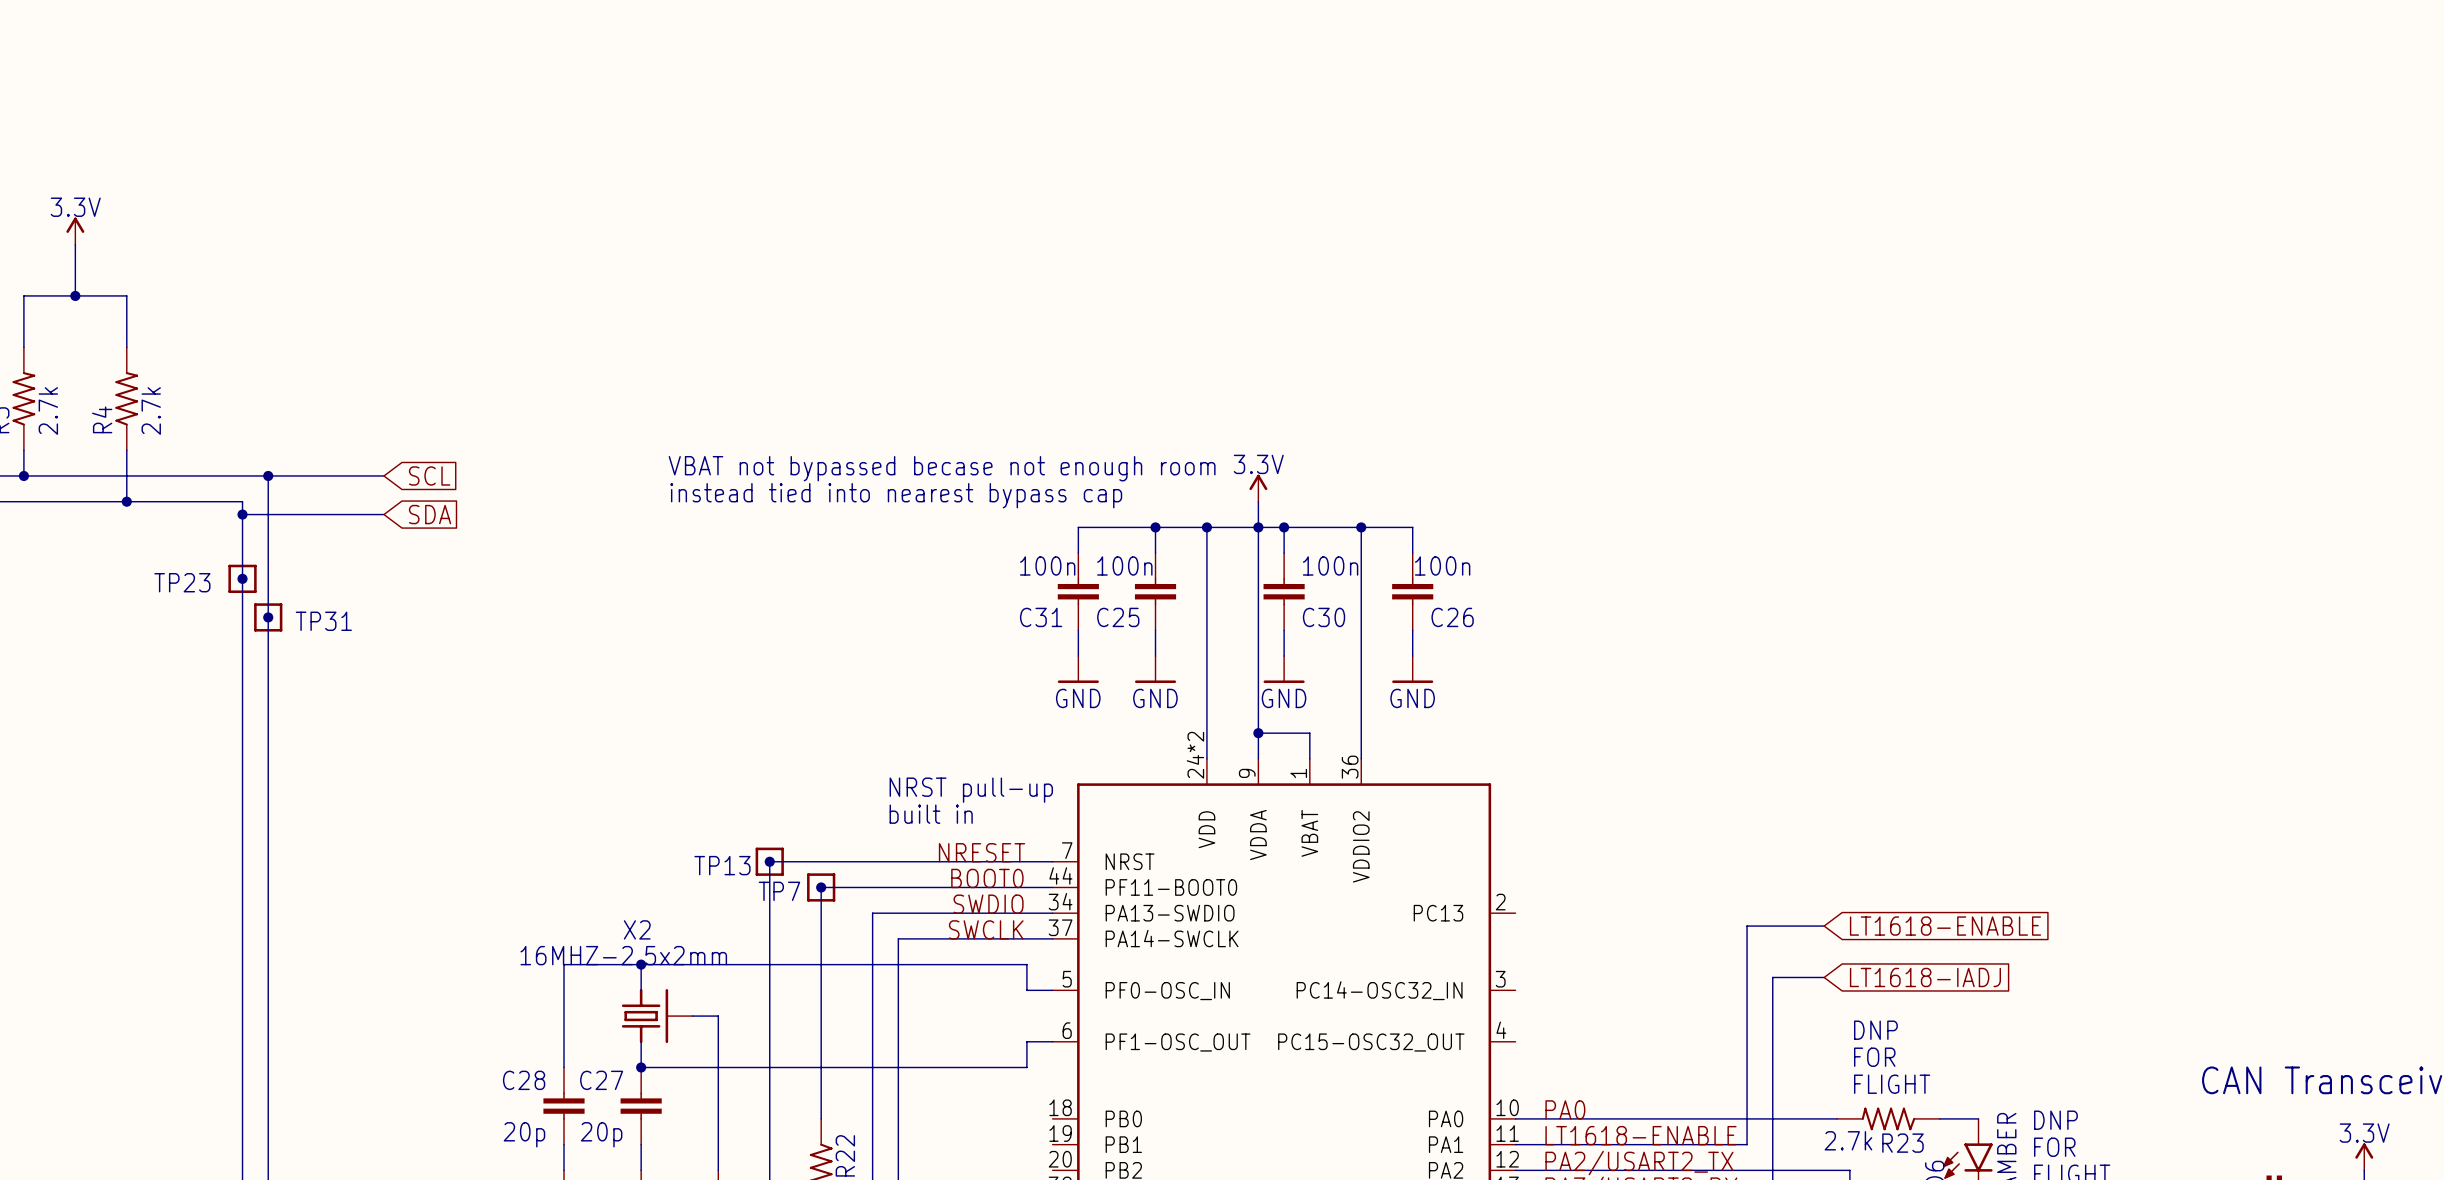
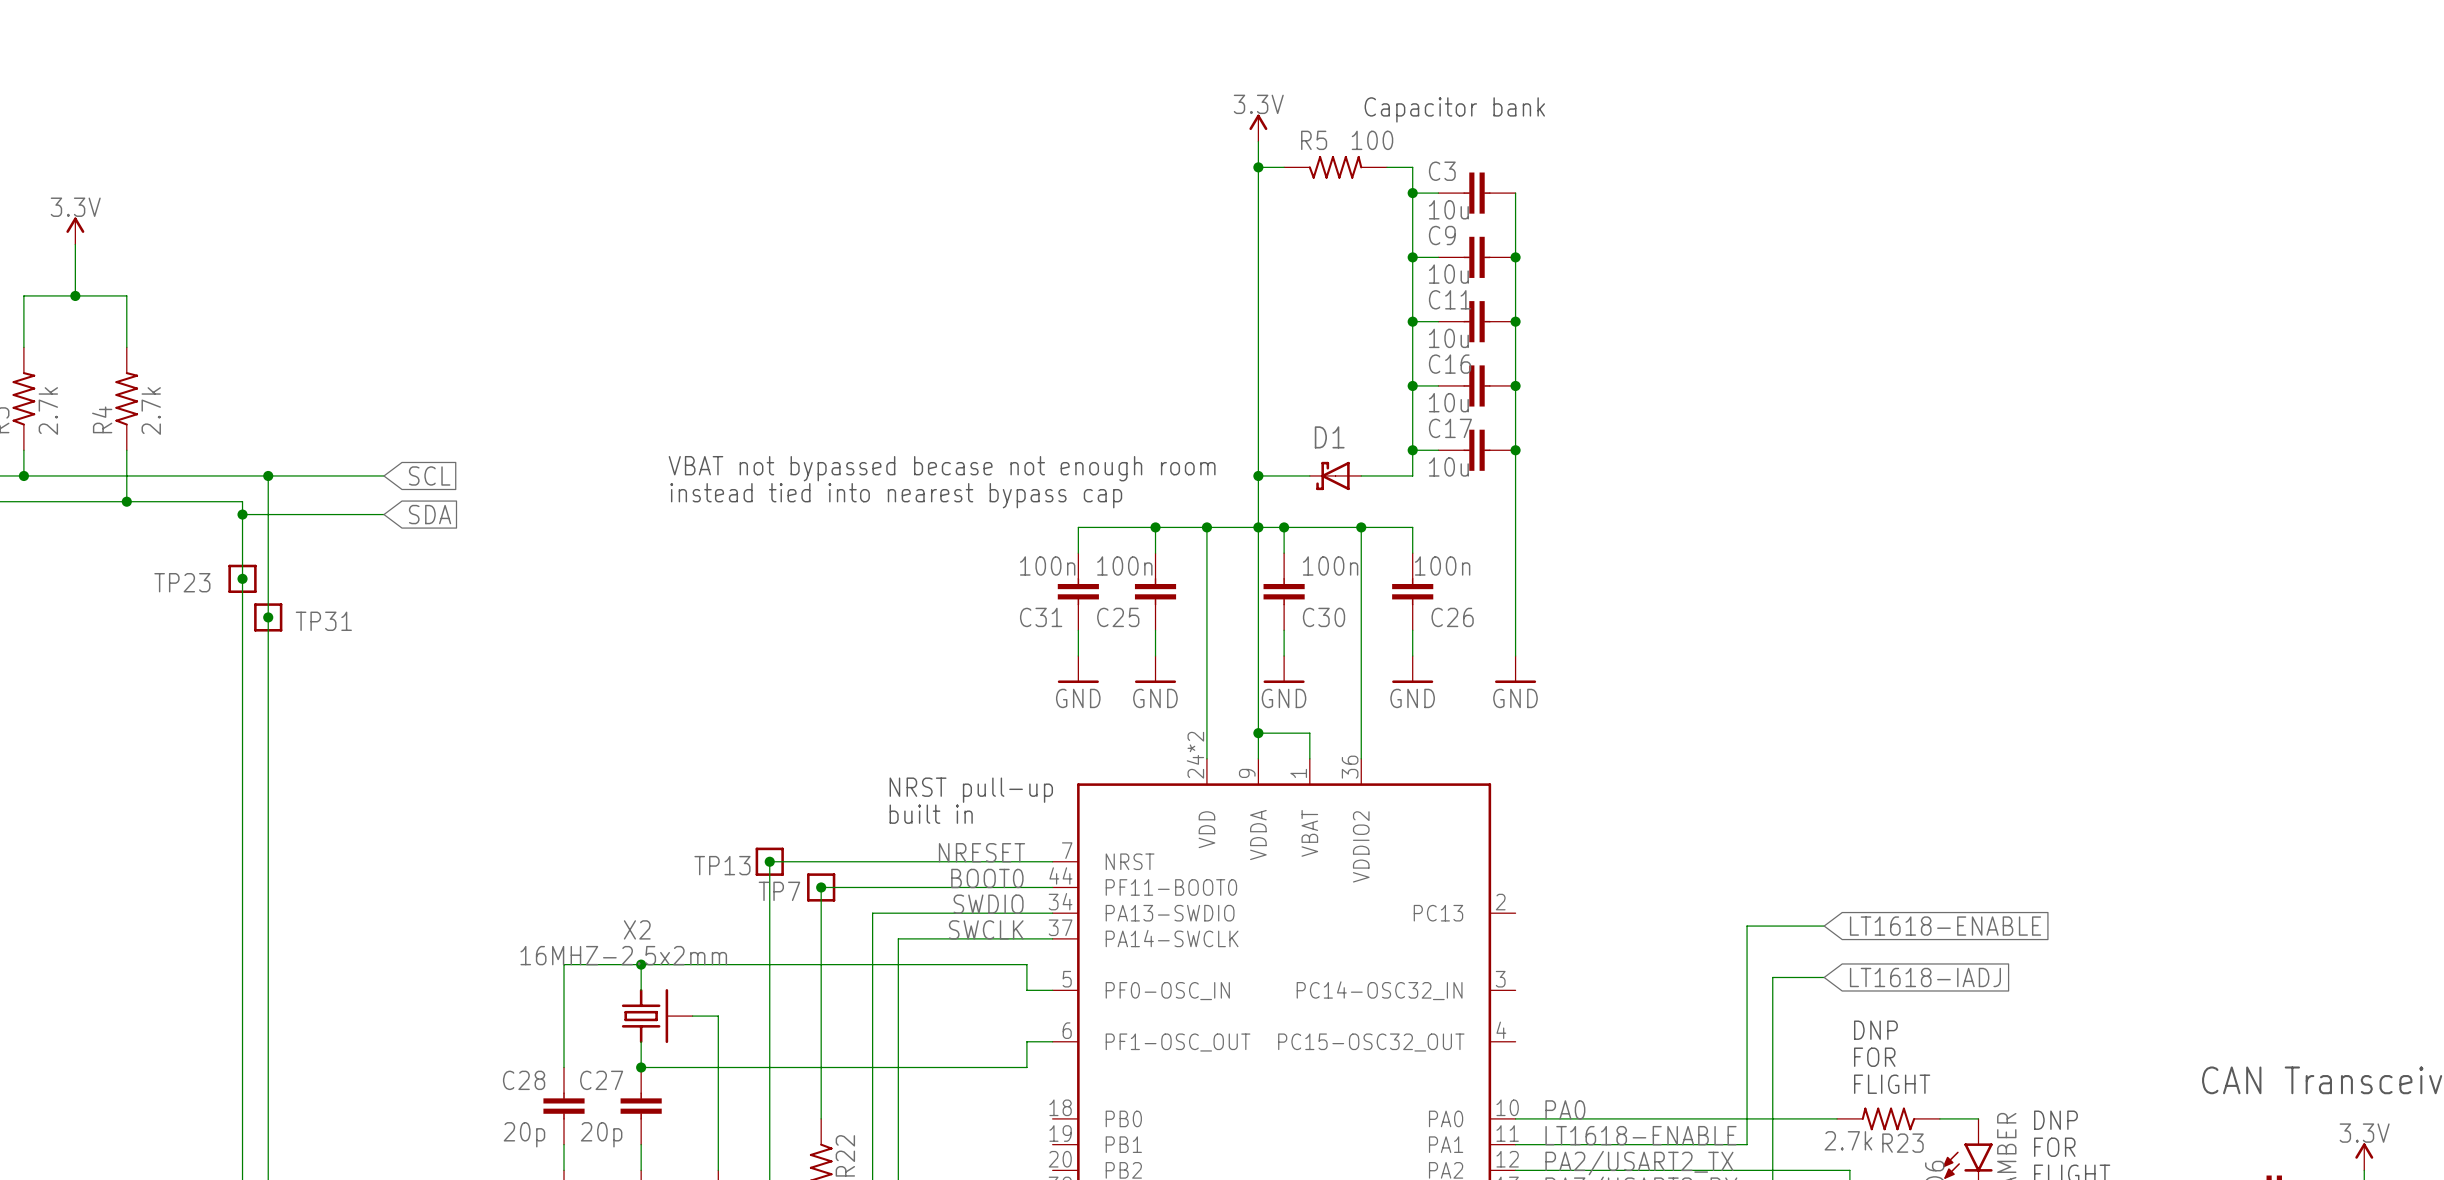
text: none -> Capacitor bank (1454, 109)
power symbol: none -> 3.3V (1258, 128)
wire: none -> (1258, 141) (1258, 501)
wire: none -> (1258, 167) (1284, 167)
junction: none -> (1258, 167)
R5: none -> 100 (1335, 167)
wire: none -> (1386, 167) (1412, 167) (1412, 475) (1361, 475)
wire: none -> (1412, 193) (1438, 193)
junction: none -> (1412, 193)
C3: none -> 10u (1476, 193)
wire: none -> (1515, 193) (1515, 656)
wire: none -> (1412, 257) (1438, 257)
junction: none -> (1412, 257)
C9: none -> 10u (1476, 257)
junction: none -> (1515, 257)
wire: none -> (1412, 321) (1438, 321)
junction: none -> (1412, 321)
C11: none -> 10u (1476, 321)
junction: none -> (1515, 321)
wire: none -> (1412, 385) (1438, 385)
junction: none -> (1412, 385)
C16: none -> 10u (1476, 385)
junction: none -> (1515, 385)
wire: none -> (1412, 450) (1438, 450)
junction: none -> (1412, 450)
C17: none -> 10u (1476, 450)
junction: none -> (1515, 450)
wire: none -> (1258, 475) (1309, 475)
junction: none -> (1258, 475)
D1: none -> (1335, 475)
power symbol: 3.3V (1258, 488) -> none
power symbol: none -> GND (1515, 669)

